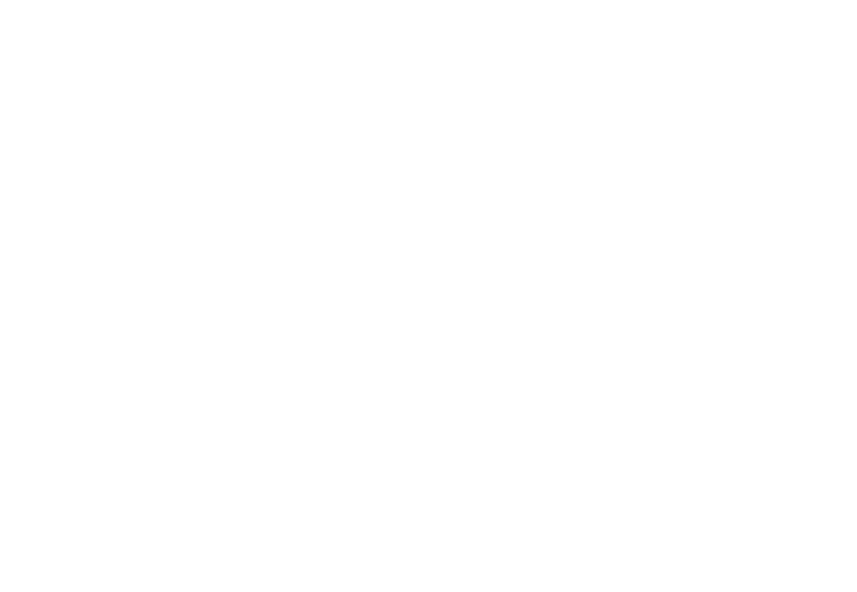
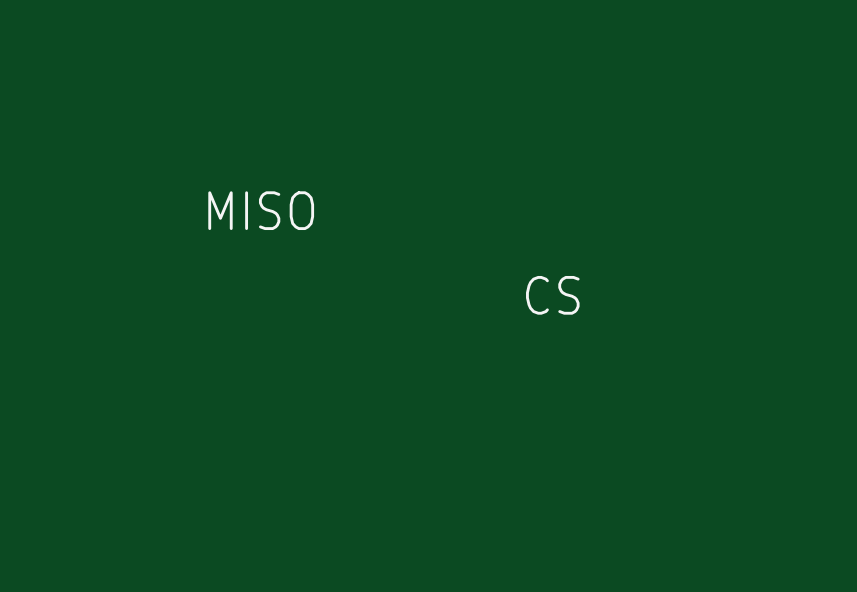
text: none -> MISO (261, 210)
text: none -> CS (552, 295)

